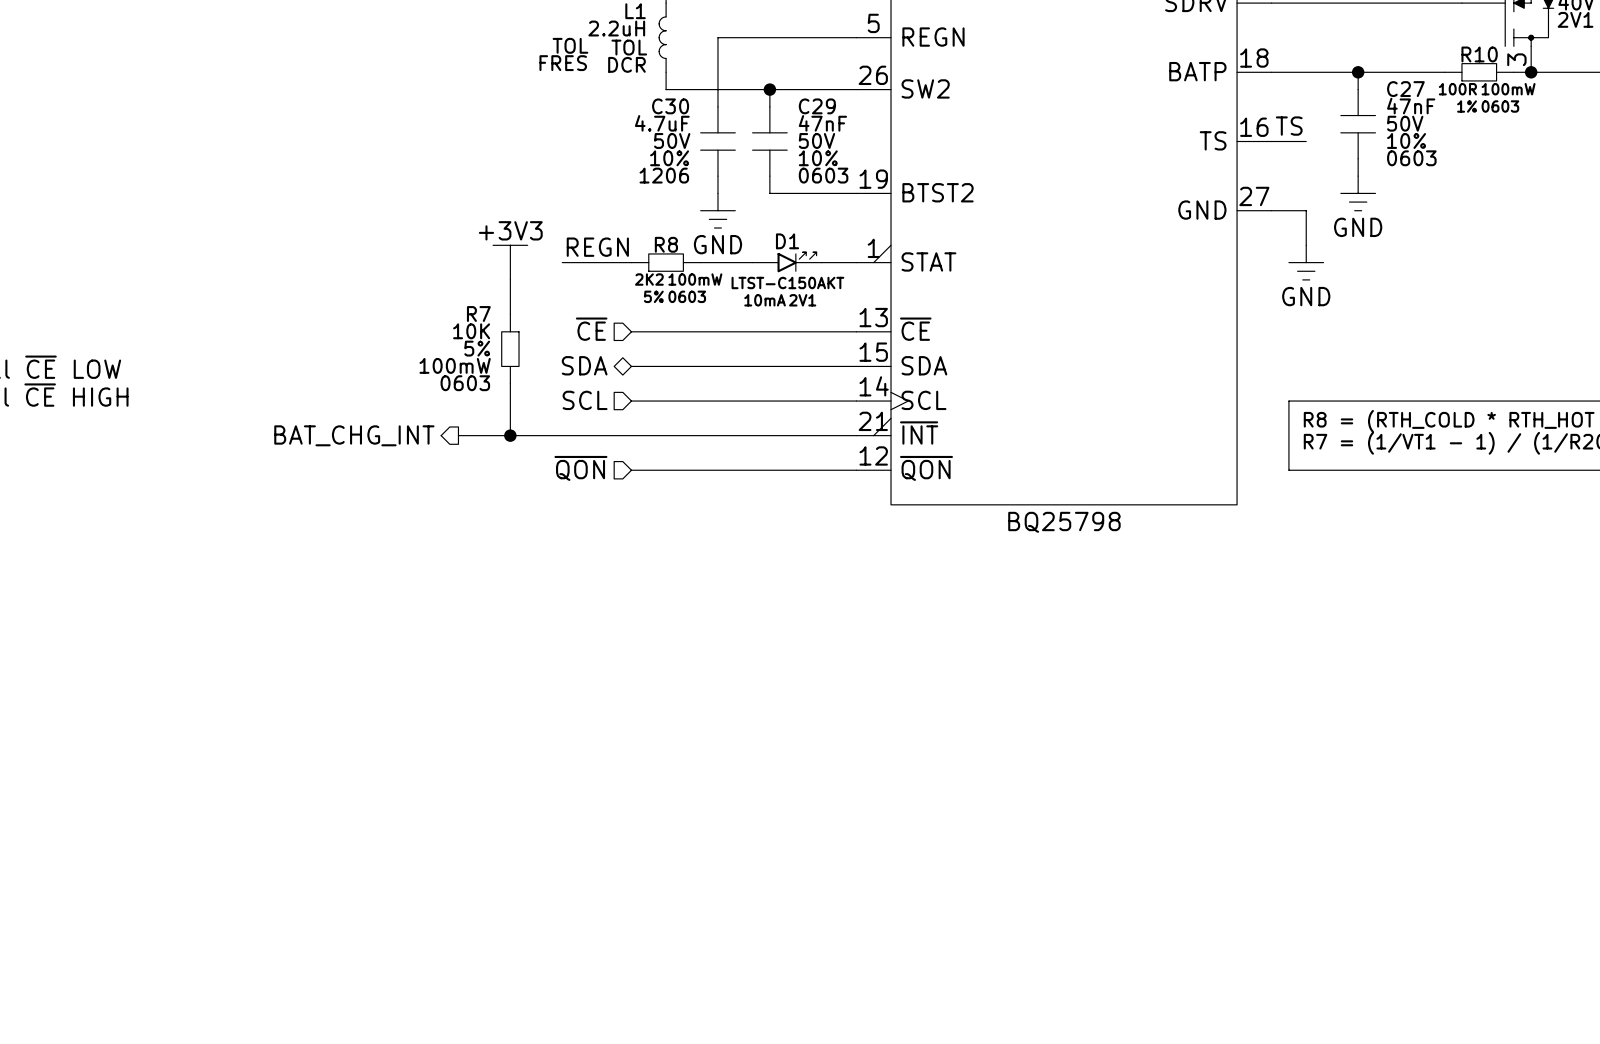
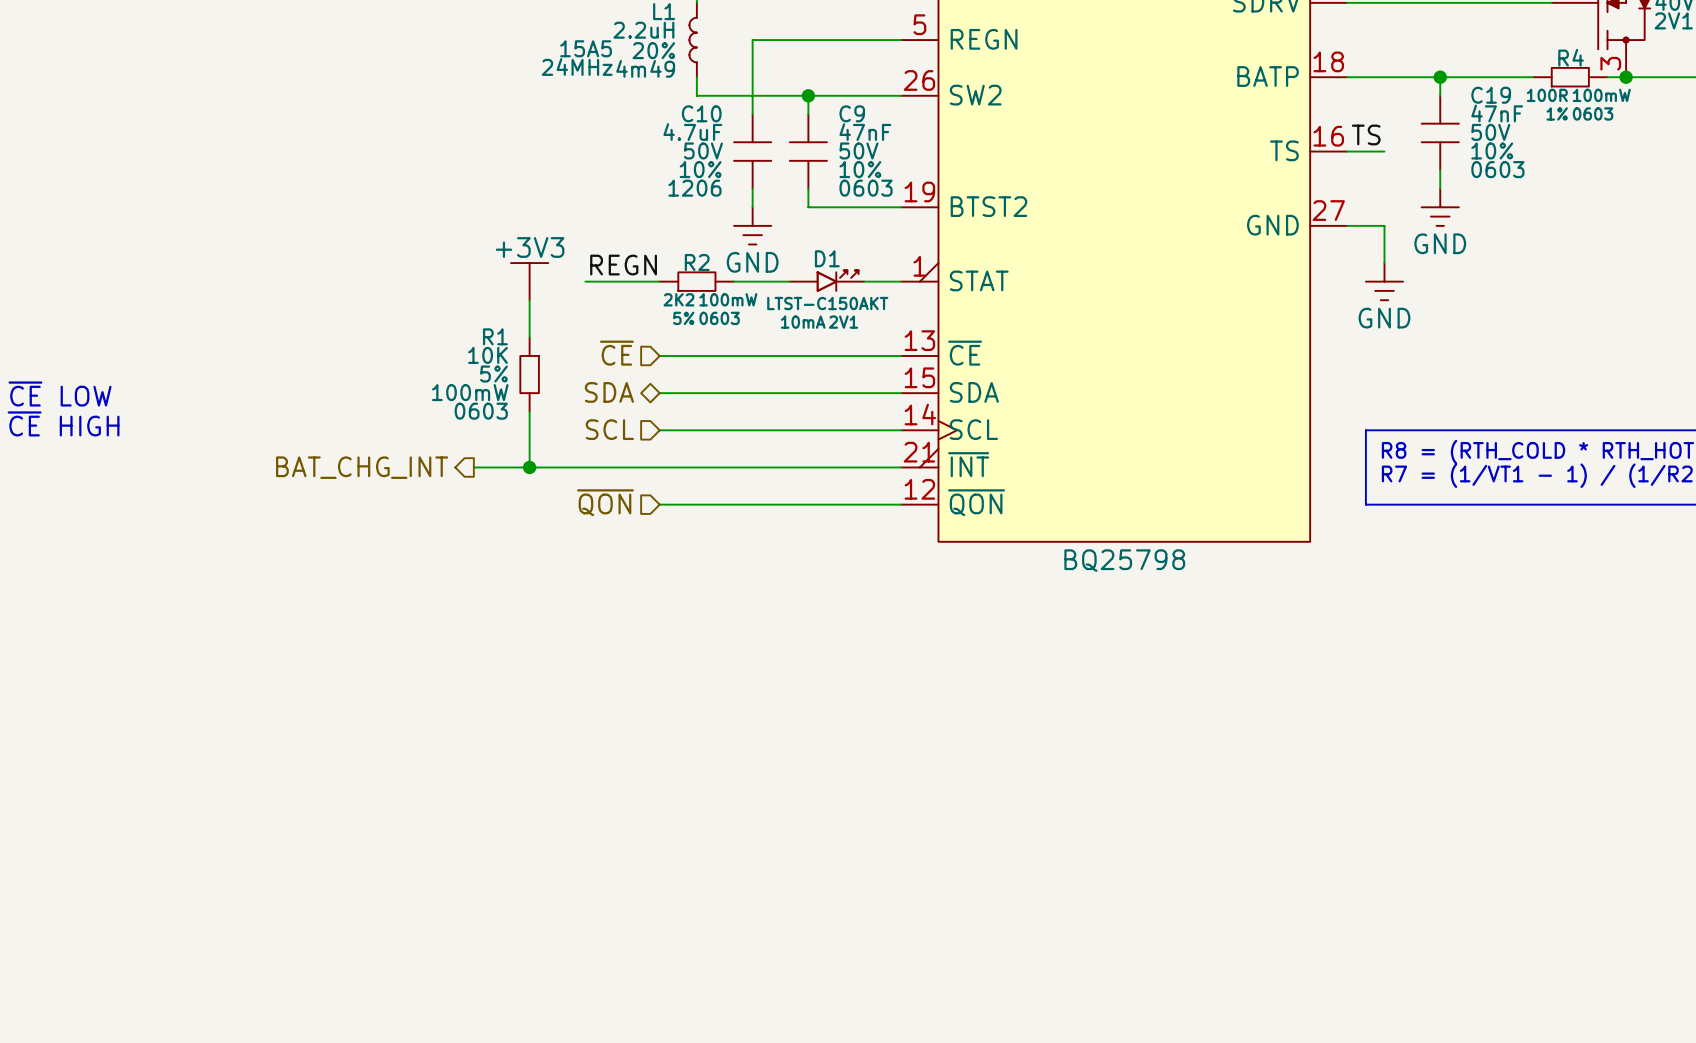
L1 text: TOL (570, 45) -> 15A5 (586, 48)
L1 text: TOL (629, 47) -> 20% (653, 50)
R10 name: R10 (1479, 54) -> R4 (1571, 57)
L1 text: FRES (563, 63) -> 24MHz (577, 67)
L1 text: DCR (626, 64) -> 4m49 (645, 68)
C27 name: C27 (1405, 89) -> C19 (1491, 95)
C30 name: C30 (670, 106) -> C10 (701, 113)
C29 name: C29 (817, 106) -> C9 (852, 113)
R8 name: R8 (666, 244) -> R2 (697, 262)
R7 name: R7 (478, 314) -> R1 (495, 336)

